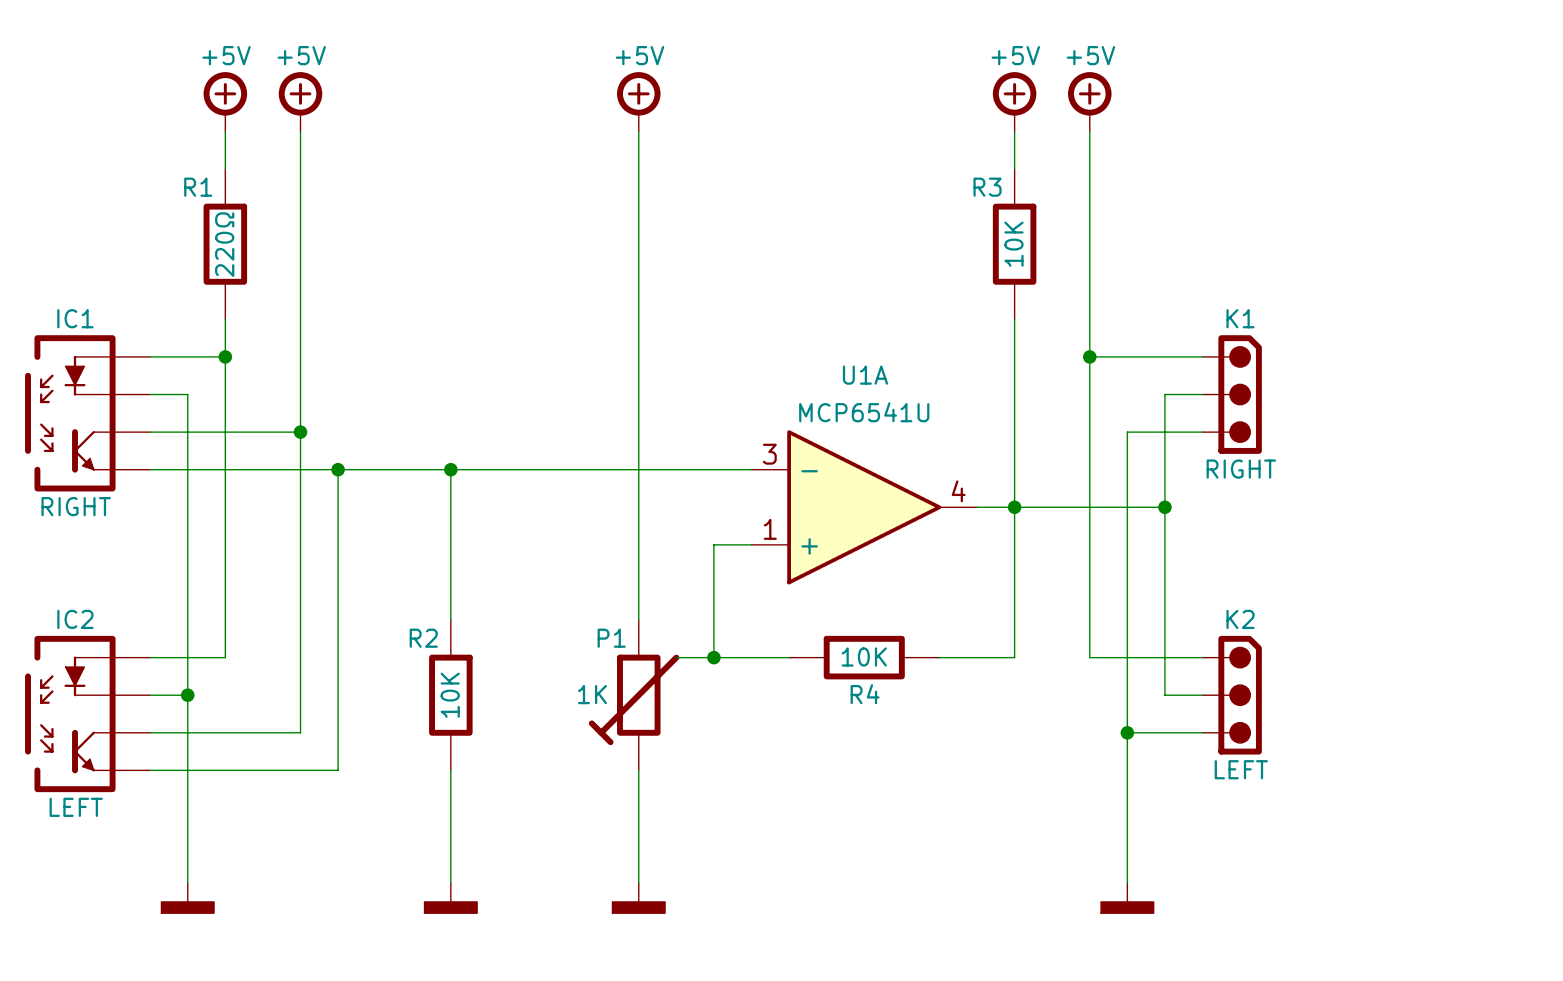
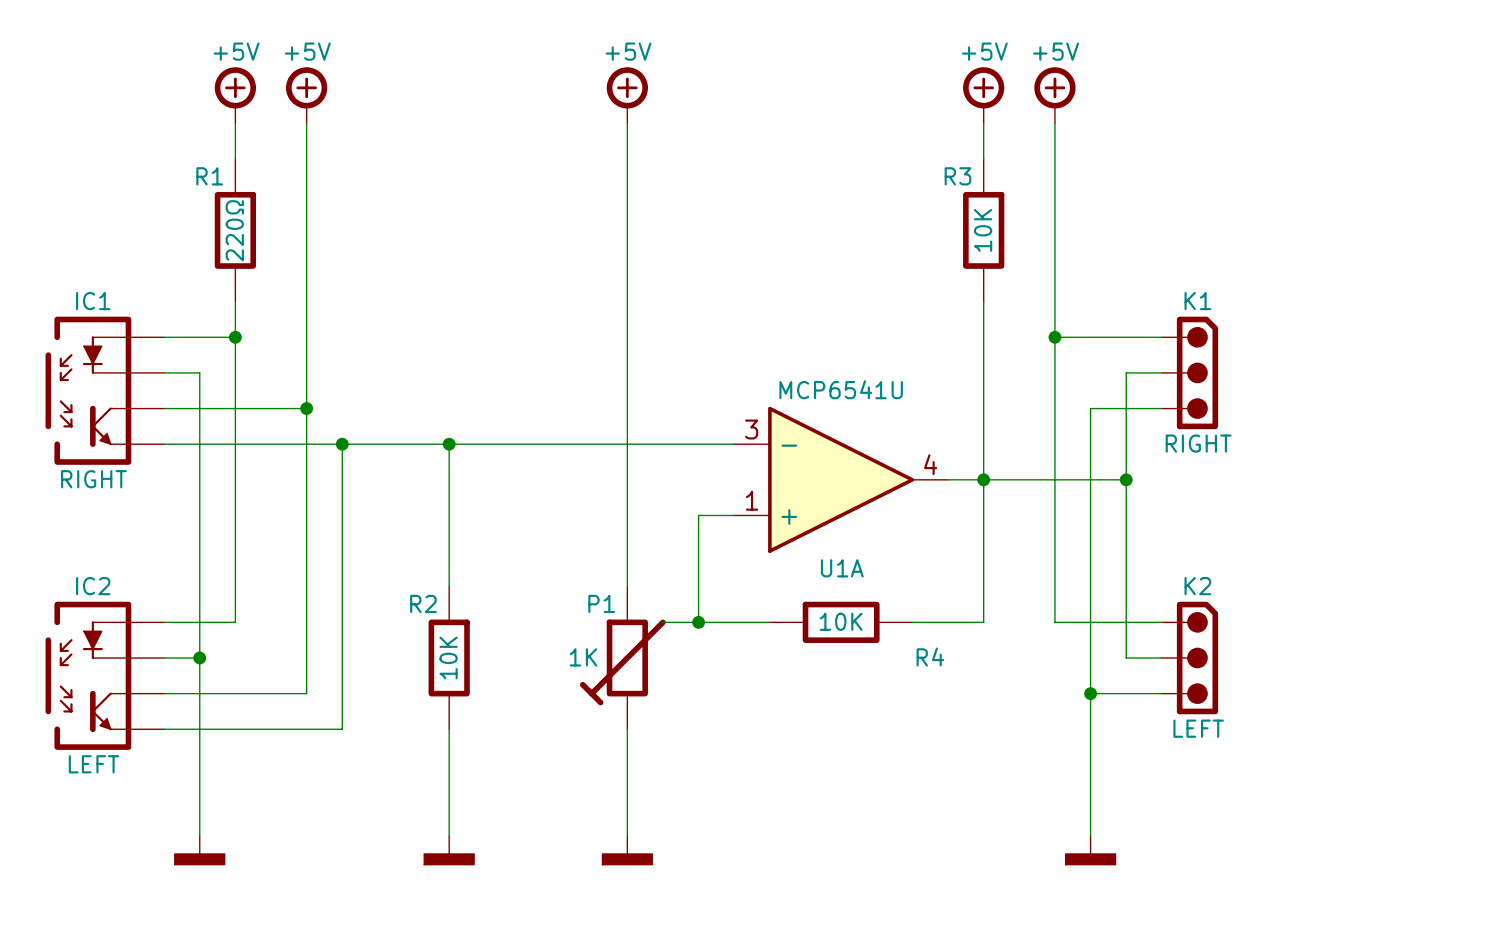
U1A name position: U1A (865, 375) -> U1A (842, 568)
R4 name position: R4 (865, 694) -> R4 (930, 657)

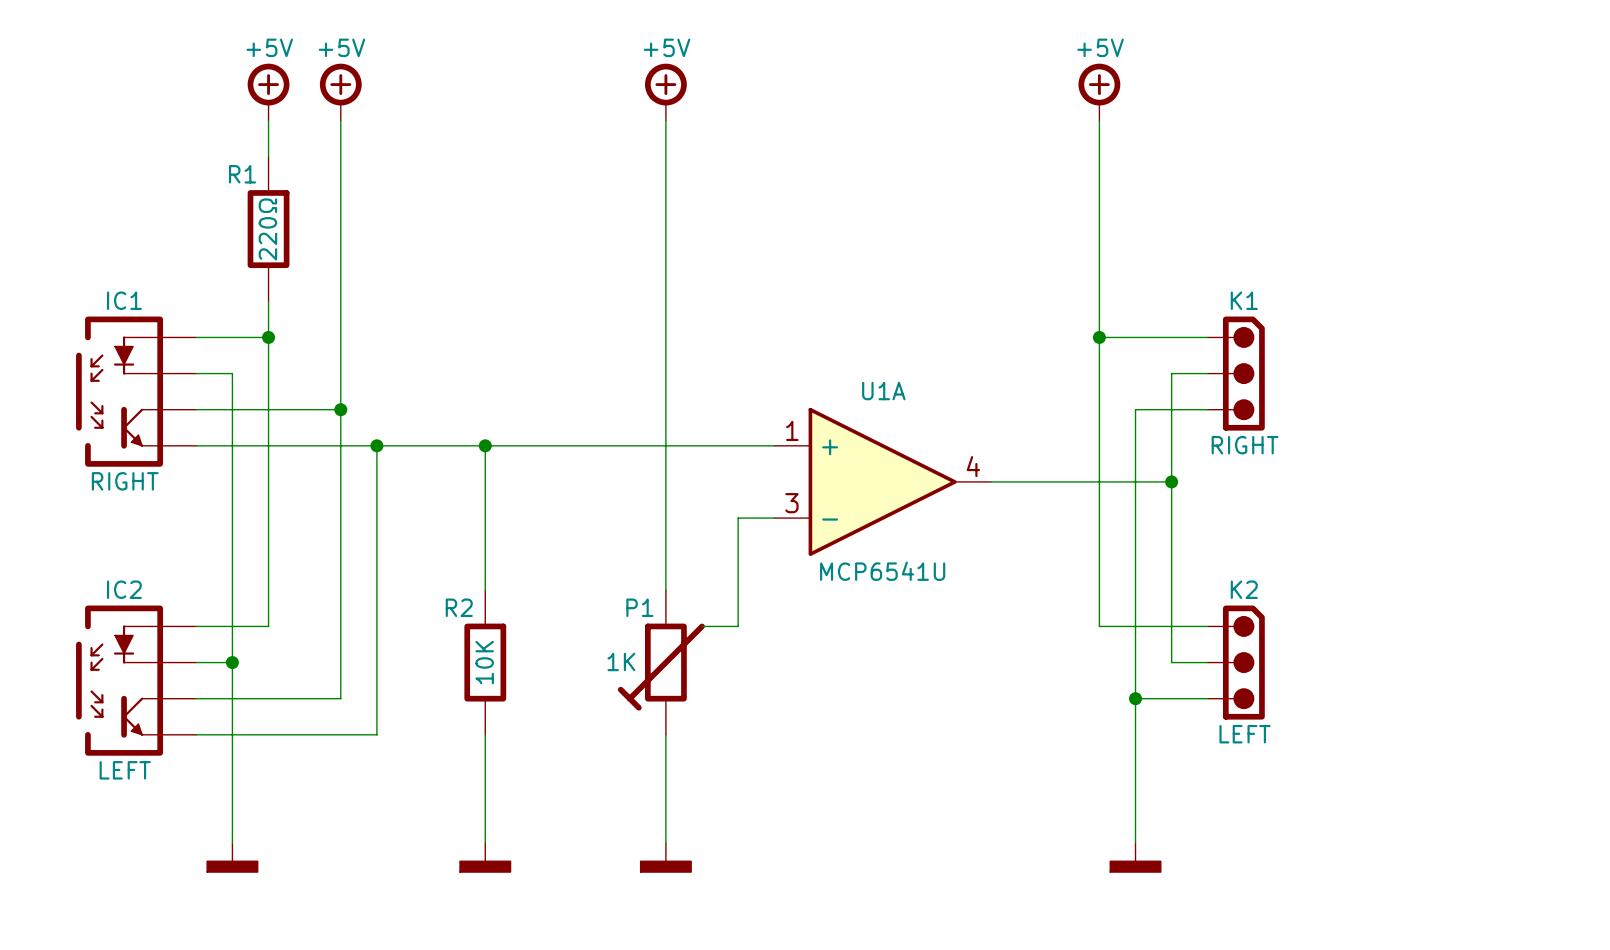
power symbol: (983, 95) -> none
wire: (983, 123) (983, 159) -> none
R3: 10K (983, 230) -> none
wire: (983, 301) (983, 622) (912, 622) -> none
U1A flip: as is (841, 479) -> up-down (882, 481)
junction: (983, 479) -> none
wire: (698, 622) (769, 622) -> none
junction: (698, 622) -> none
R4: 10K (841, 622) -> none

